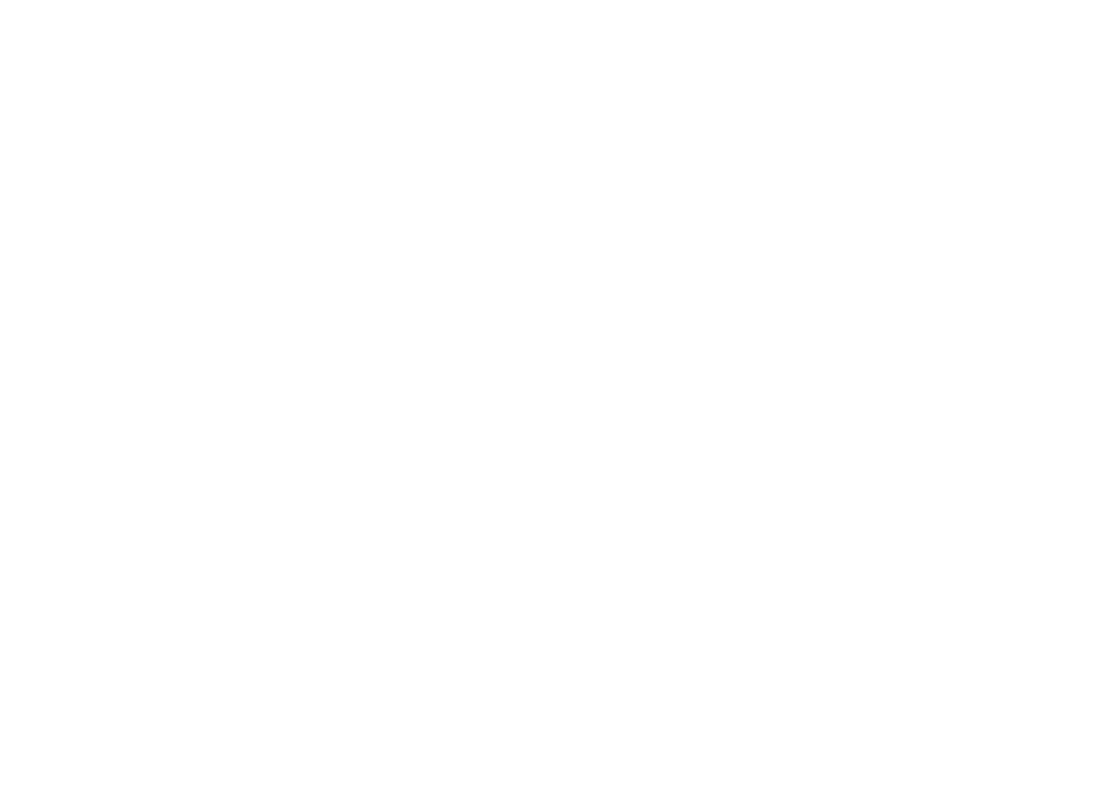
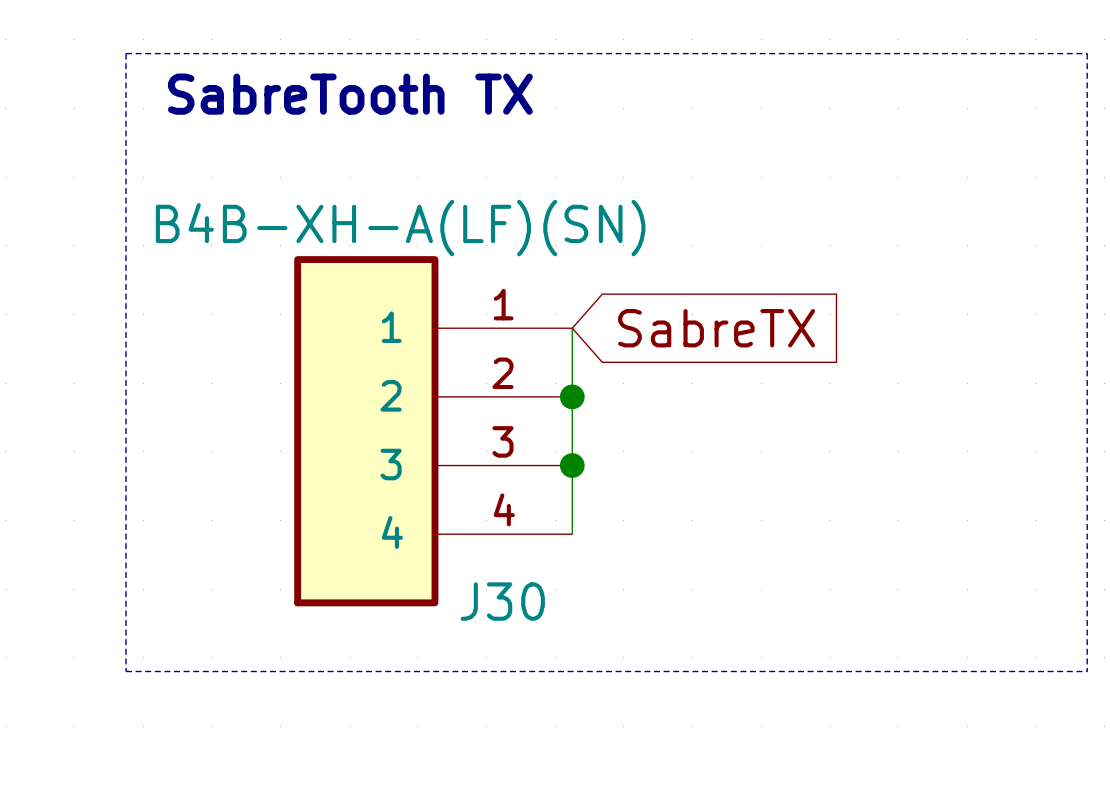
line: none -> (126, 53) (1087, 53) (1087, 671) (126, 671) (126, 53)
text: none -> SabreTooth TX (350, 94)
wire: none -> (572, 328) (572, 534)
global label: none -> SabreTX (716, 328)
junction: none -> (572, 396)
J30: none -> B4B-XH-A(LF)(SN) (433, 431)
junction: none -> (572, 465)

